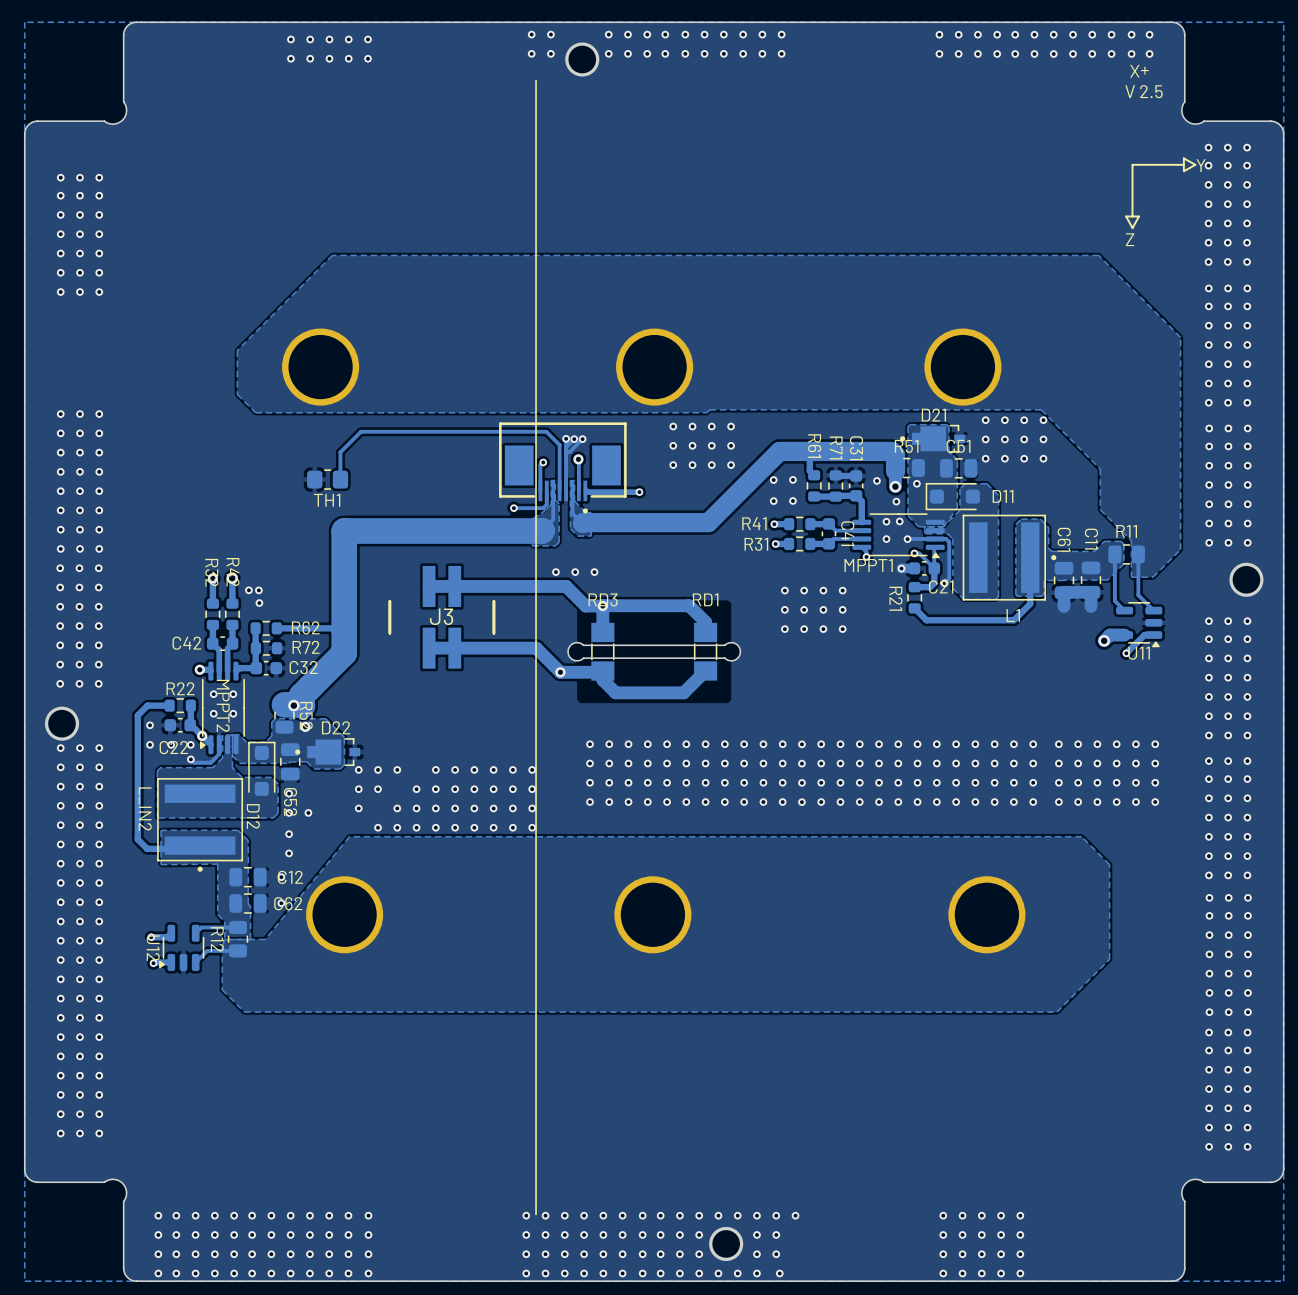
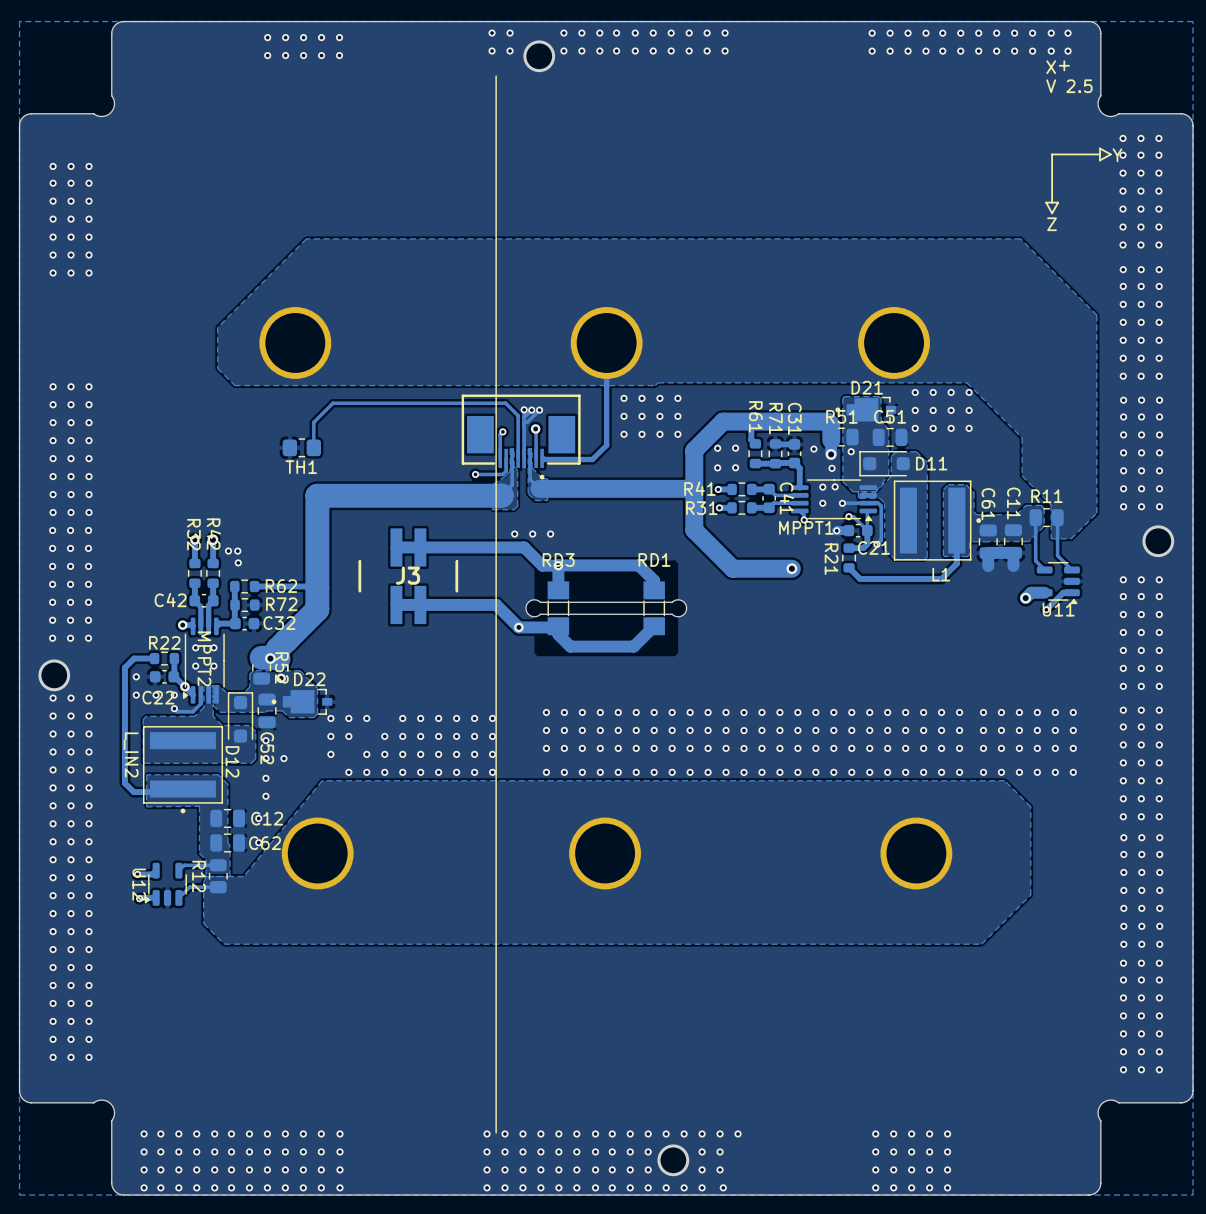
track: none -> (606, 342) (606, 445) (592, 459)
track: (748, 482) (708, 522) (582, 523) -> (694, 488) (539, 488)
track: none -> (694, 450) (694, 530) (732, 568) (793, 569)
via: (639, 492) -> none
via: (784, 590) -> none
via: (804, 590) -> none
via: (823, 590) -> none
via: (842, 590) -> none
via: (784, 609) -> none
via: (804, 609) -> none
via: (823, 609) -> none
via: (842, 609) -> none
via: none -> (791, 568)
via: (784, 629) -> none
via: (804, 629) -> none
via: (823, 629) -> none
via: (842, 629) -> none
via: (589, 744) -> none
via: (609, 744) -> none
via: (628, 744) -> none
via: (647, 744) -> none
via: (667, 744) -> none
via: (686, 744) -> none
via: (705, 744) -> none
via: (724, 744) -> none
via: (744, 744) -> none
via: (763, 744) -> none
via: (782, 744) -> none
via: (801, 744) -> none
via: (821, 744) -> none
via: (840, 744) -> none
via: (859, 744) -> none
via: (879, 744) -> none
via: (898, 744) -> none
via: (917, 744) -> none
via: (936, 744) -> none
via: (956, 744) -> none
via: (975, 744) -> none
via: (994, 744) -> none
via: (1013, 744) -> none
via: (1033, 744) -> none
via: (1058, 744) -> none
via: (1078, 744) -> none
via: (1097, 744) -> none
via: (1116, 744) -> none
via: (1135, 744) -> none
via: (1155, 744) -> none
via: none -> (546, 772)
via: none -> (564, 772)
via: none -> (582, 772)
via: none -> (600, 772)
via: none -> (618, 772)
via: none -> (636, 772)
via: none -> (654, 772)
via: none -> (672, 772)
via: none -> (690, 772)
via: none -> (708, 772)
via: none -> (726, 772)
via: none -> (744, 772)
via: none -> (761, 772)
via: none -> (779, 772)
via: none -> (797, 772)
via: none -> (815, 772)
via: none -> (833, 772)
via: none -> (851, 772)
via: none -> (869, 772)
via: none -> (887, 772)
via: none -> (905, 772)
via: none -> (923, 772)
via: none -> (941, 772)
via: none -> (959, 772)
via: none -> (983, 772)
via: none -> (1001, 772)
via: none -> (1019, 772)
via: none -> (1037, 772)
via: none -> (1055, 772)
via: none -> (1073, 772)

